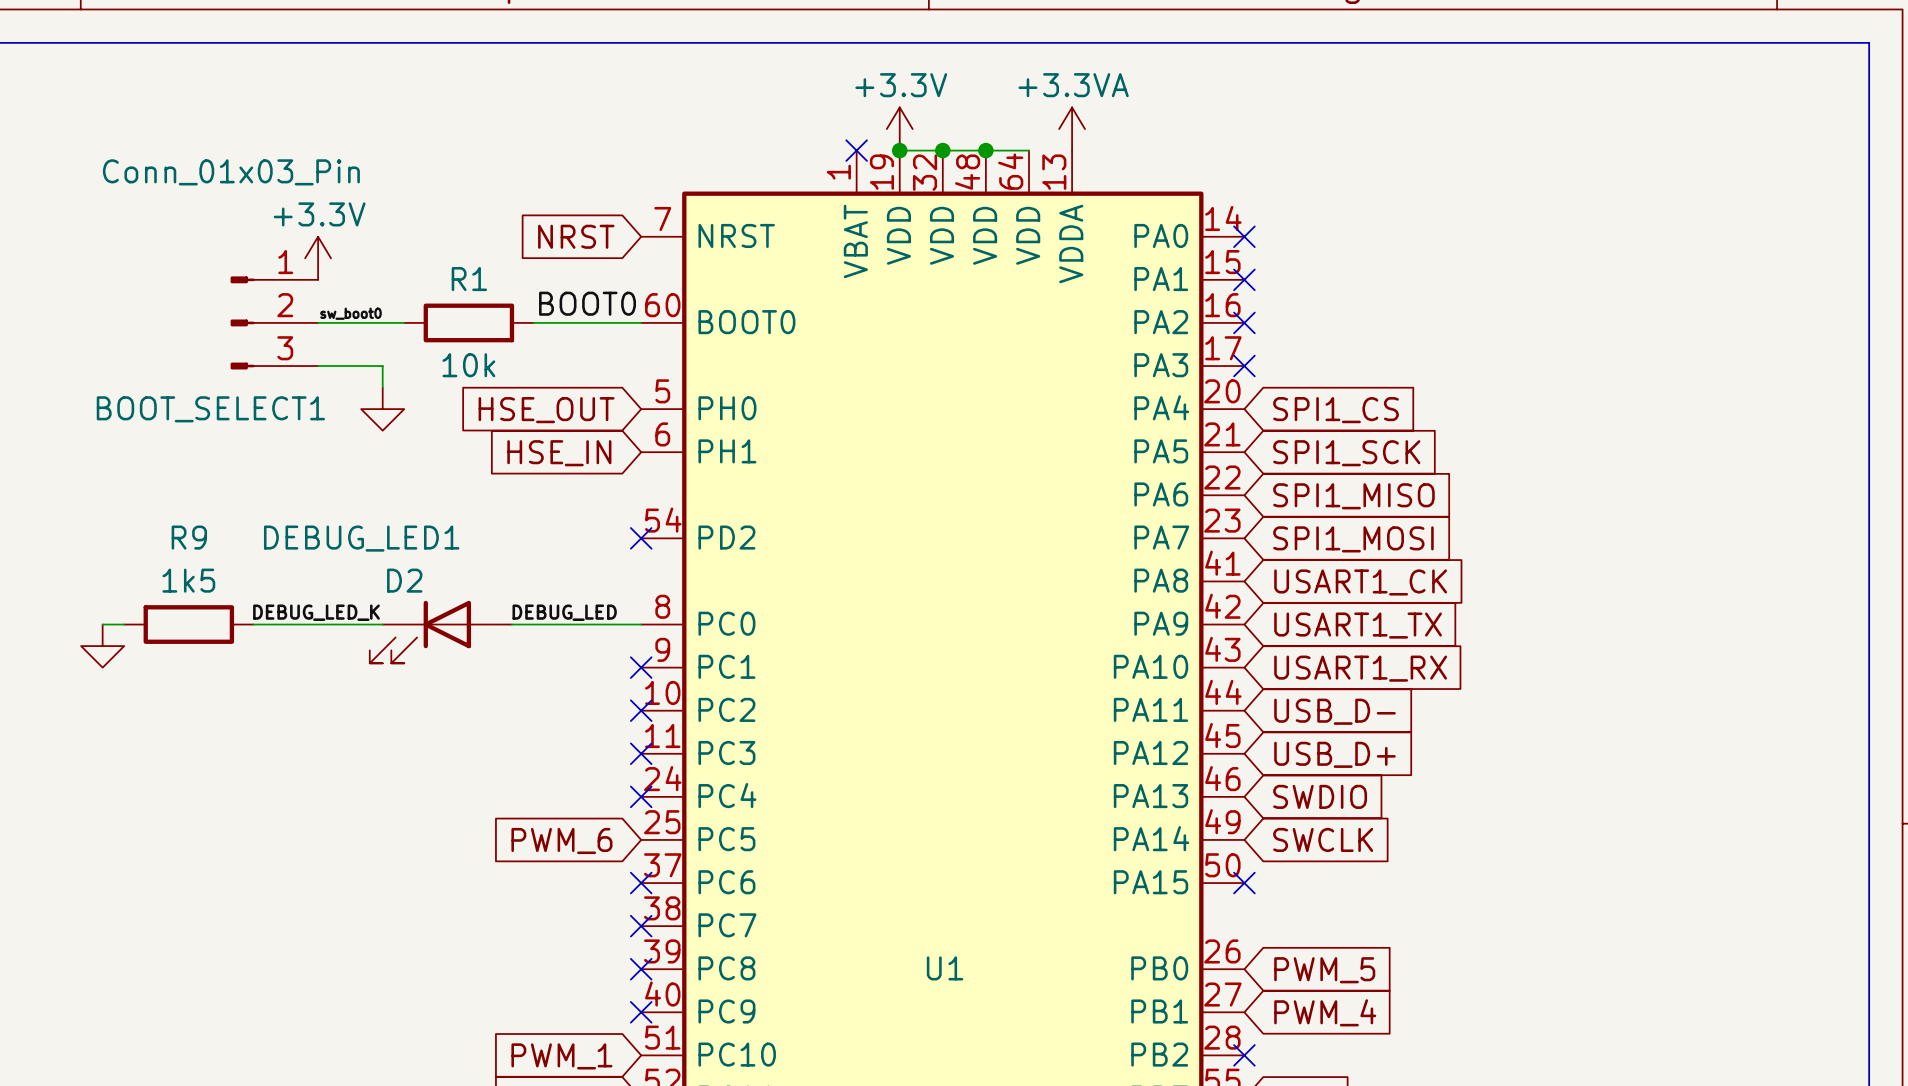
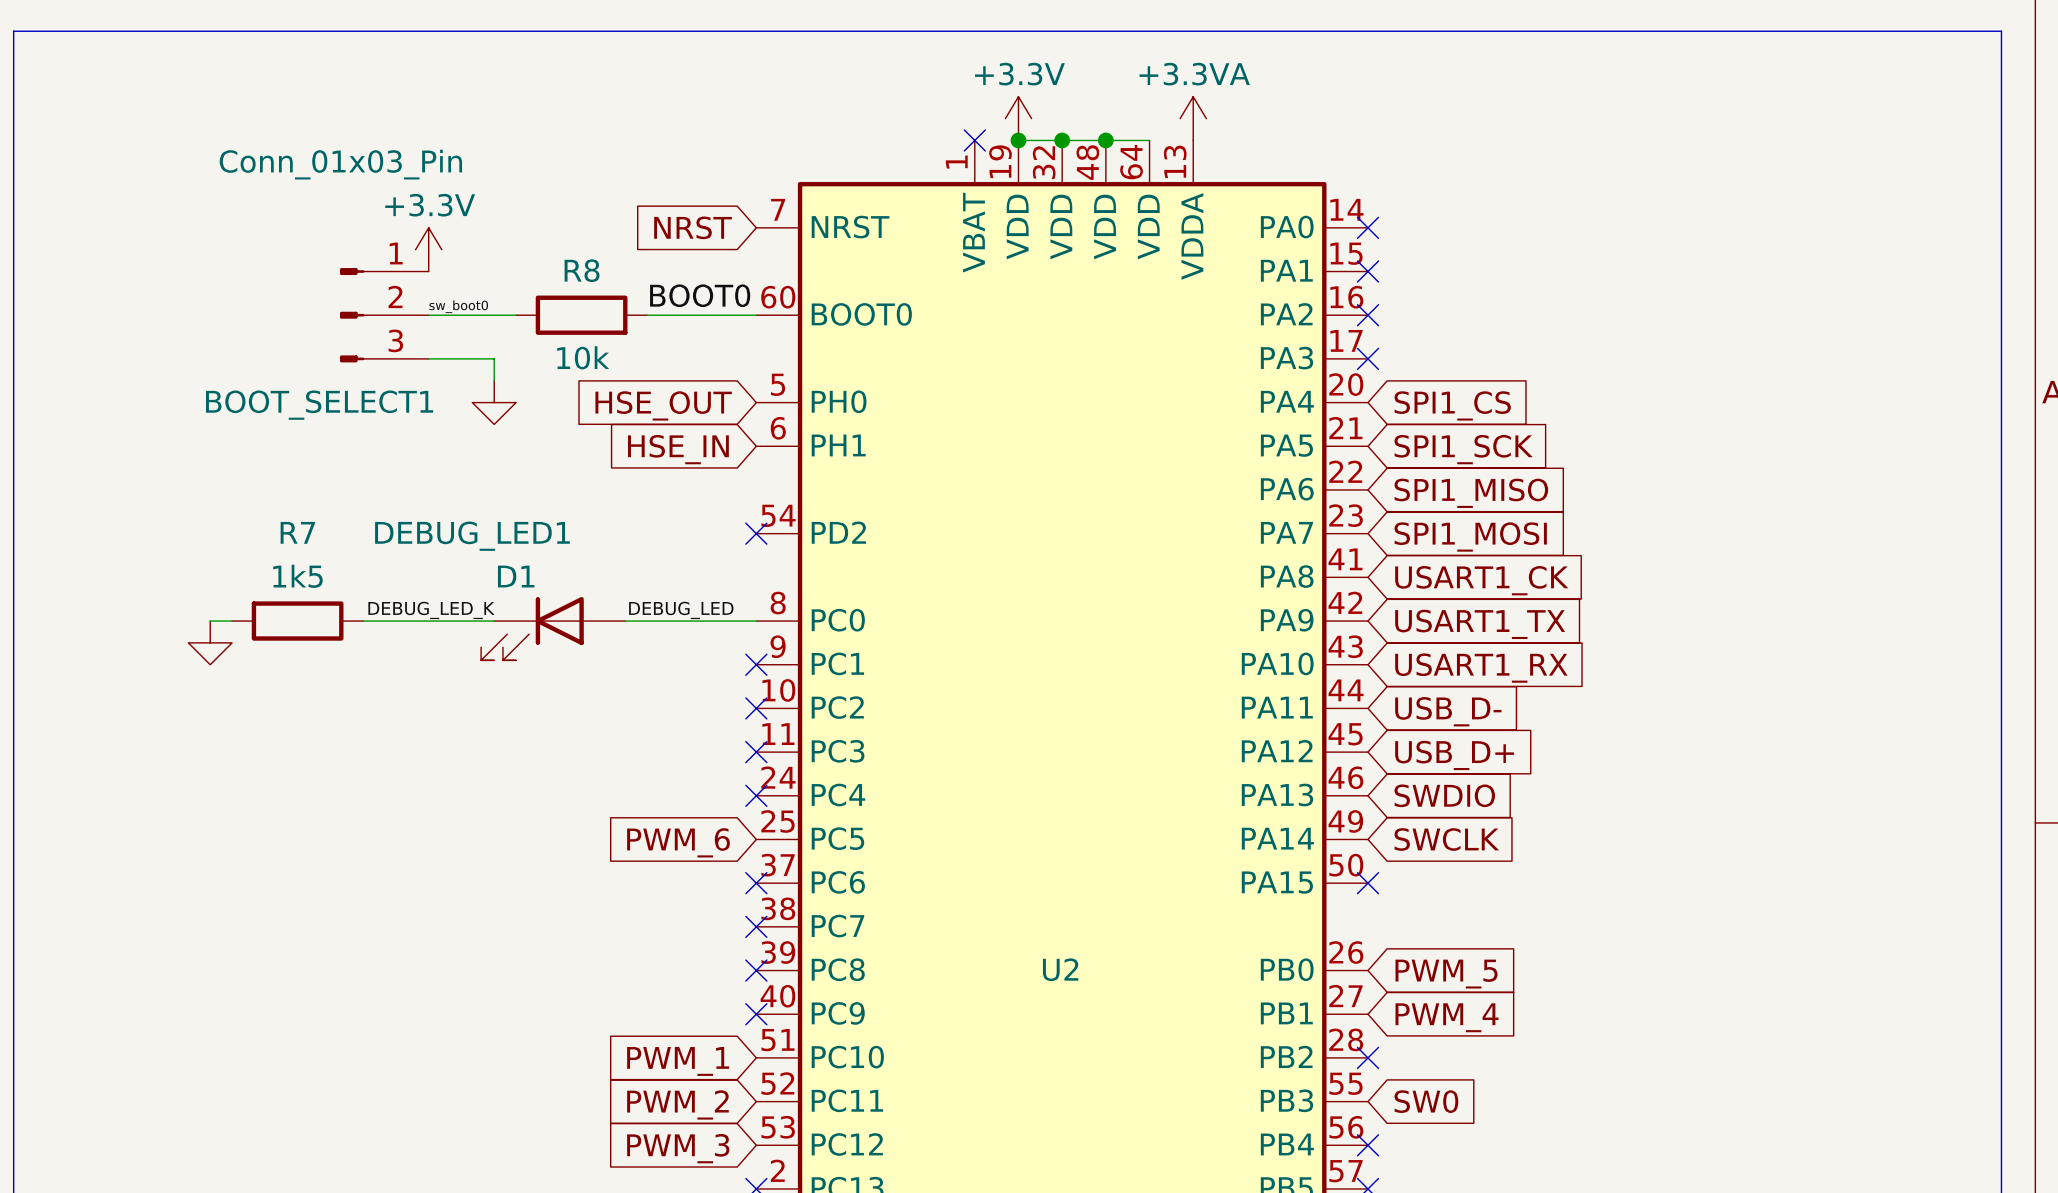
R1 name: R1 (469, 279) -> R8 (582, 270)
R9 name: R9 (189, 537) -> R7 (297, 532)
D2 name: D2 (404, 580) -> D1 (516, 576)
U1 name: U1 (945, 968) -> U2 (1060, 969)

